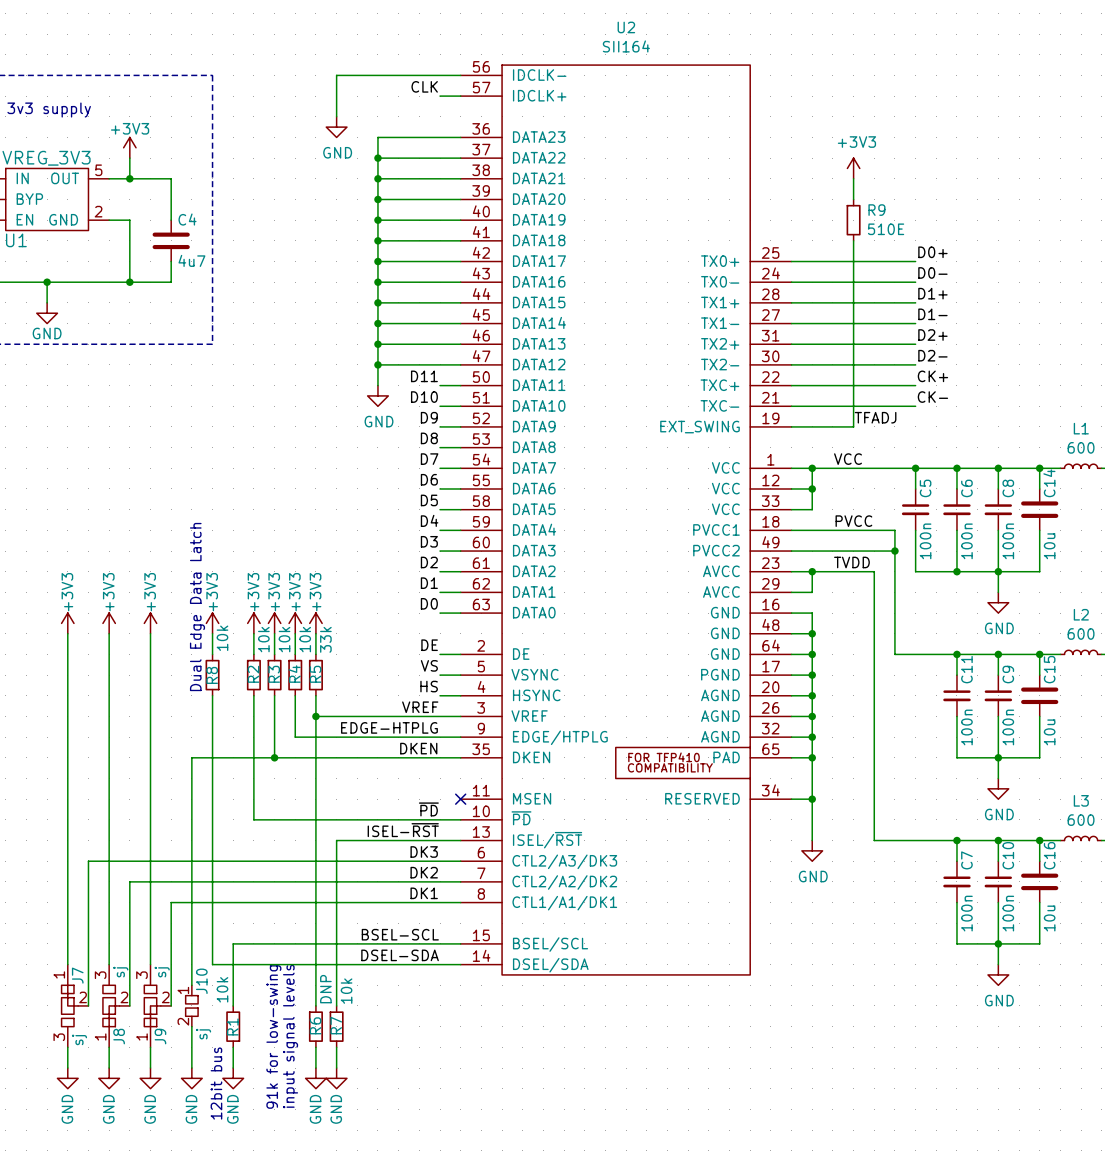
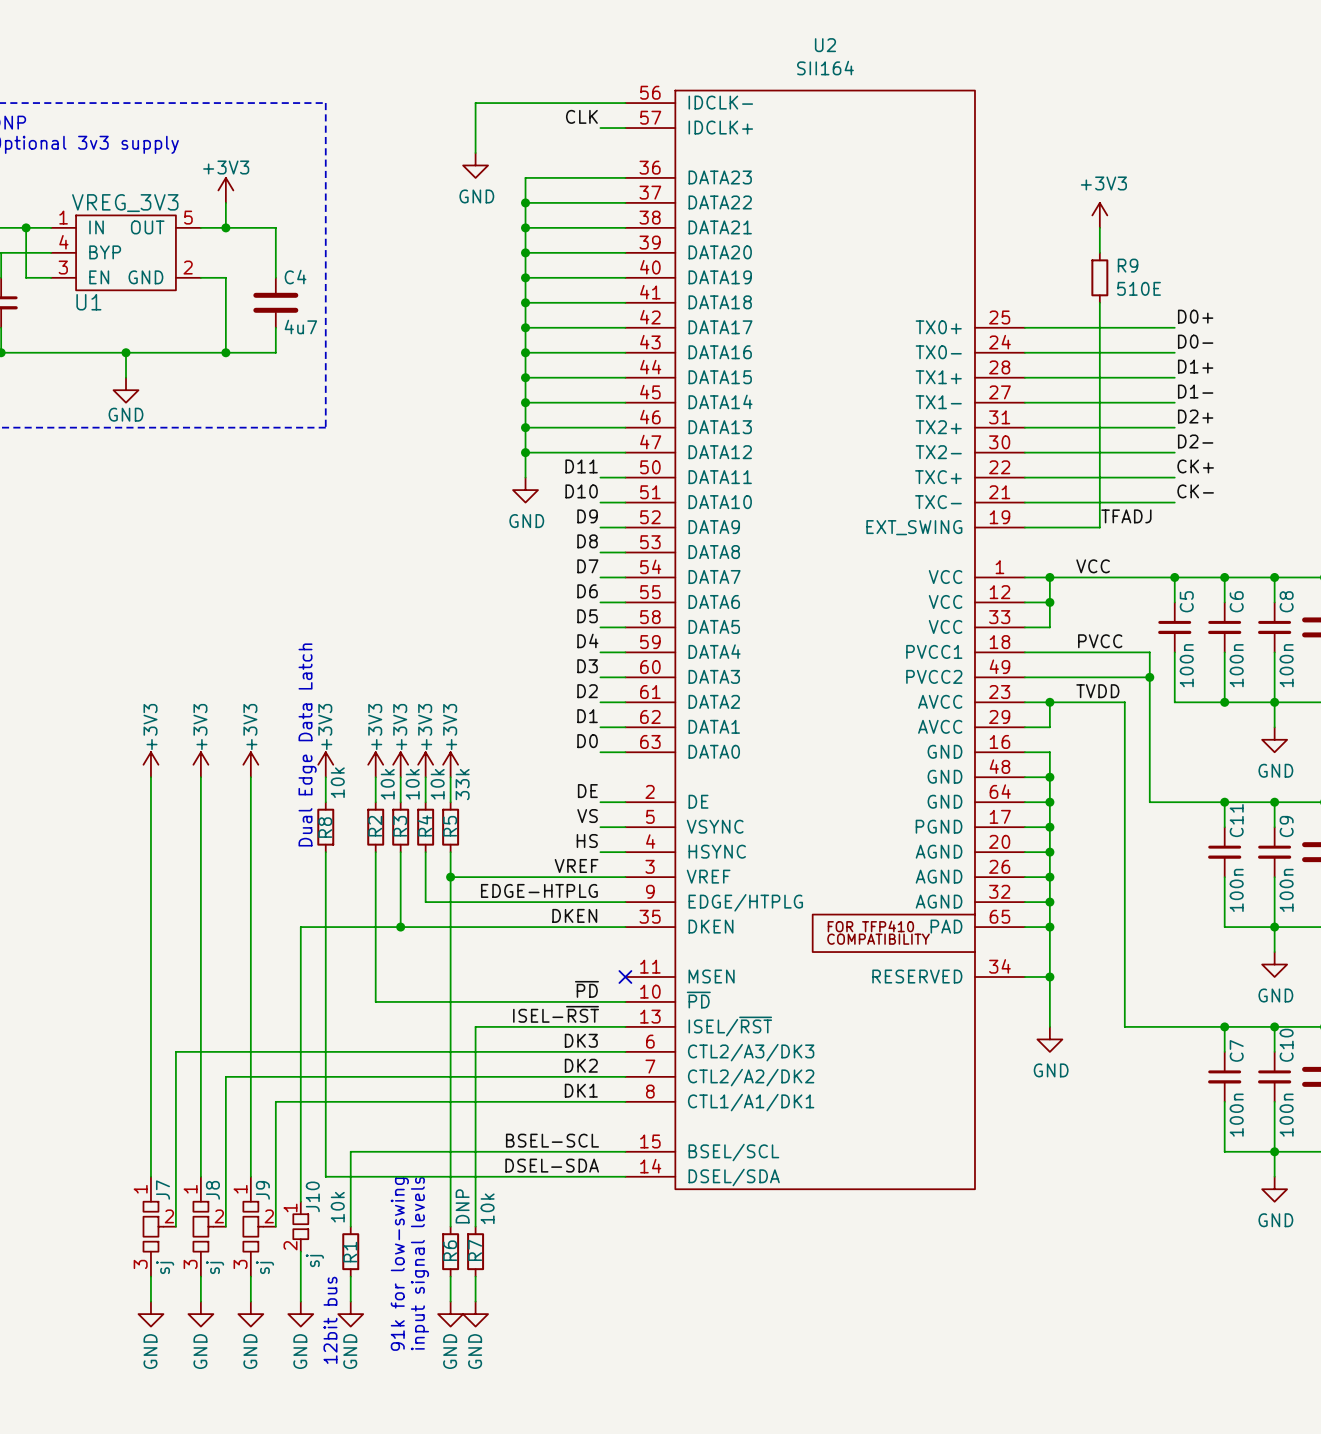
J7 symbol: [61, 964, 89, 1048] -> [143, 1176, 176, 1277]
J8 symbol: [102, 964, 130, 1048] -> [193, 1176, 226, 1277]
J9 symbol: [144, 964, 172, 1048] -> [243, 1176, 276, 1277]
J8 value position: sj (120, 972) -> sj (215, 1267)
J9 value position: sj (162, 972) -> sj (264, 1267)
J8 name position: J8 (119, 1036) -> J8 (212, 1190)
J9 name position: J9 (160, 1036) -> J9 (262, 1190)

